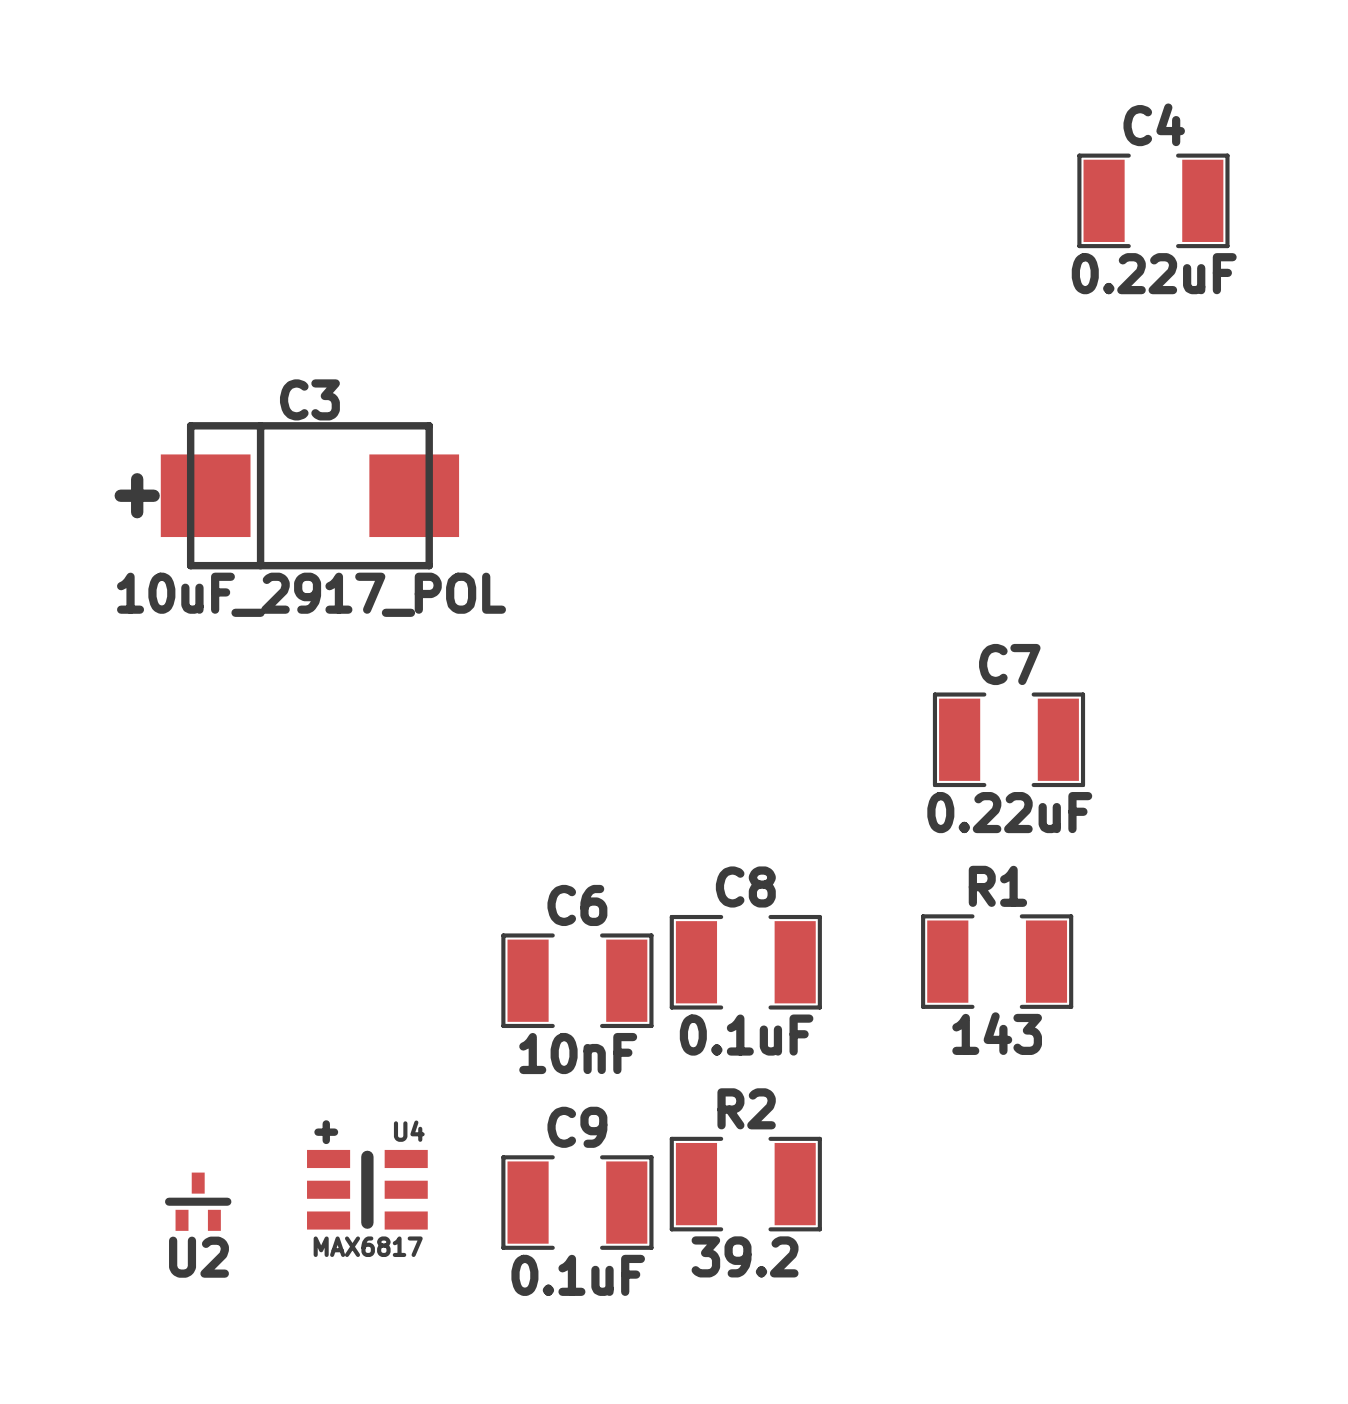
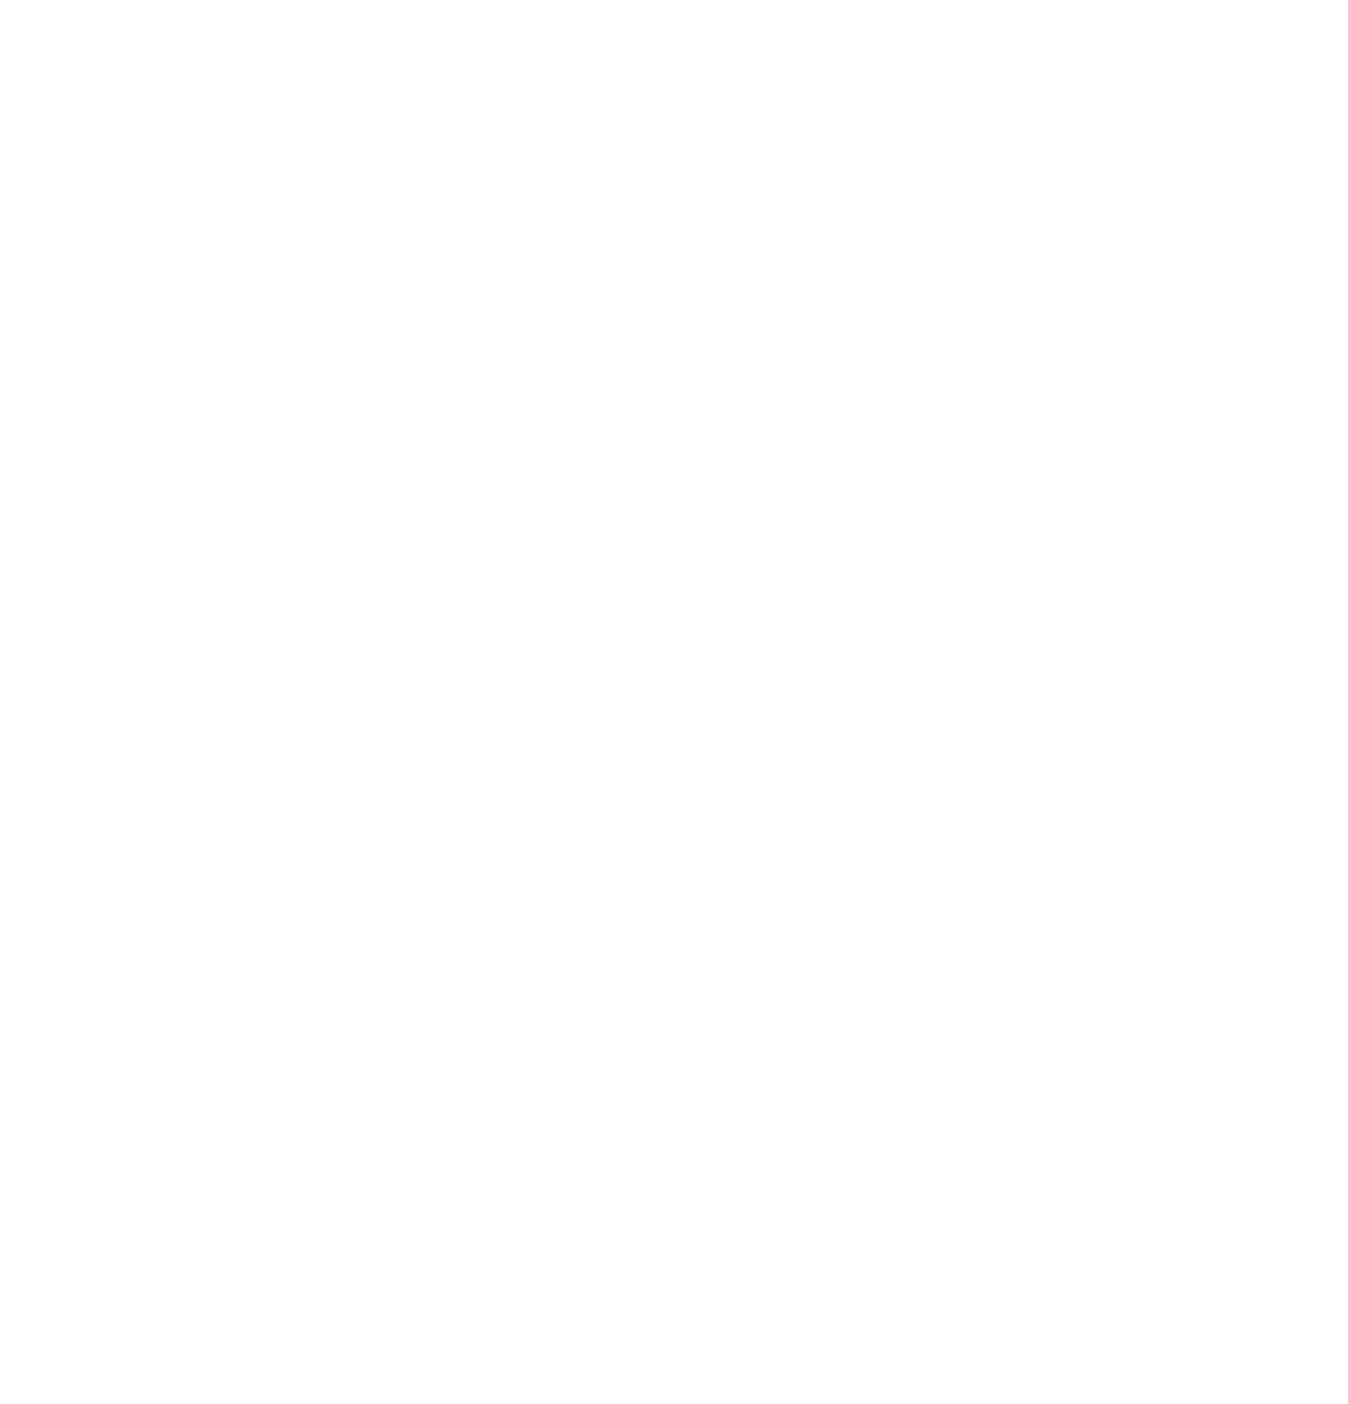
C4: 0.22uF (1153, 200) -> none
C3: 10uF_2917_POL (286, 495) -> none
C7: 0.22uF (1008, 739) -> none
R1: 143 (997, 961) -> none
C8: 0.1uF (745, 962) -> none
C6: 10nF (577, 980) -> none
U4: MAX6817 (367, 1174) -> none
R2: 39.2 (745, 1184) -> none
U2: (198, 1201) -> none
C9: 0.1uF (577, 1202) -> none

